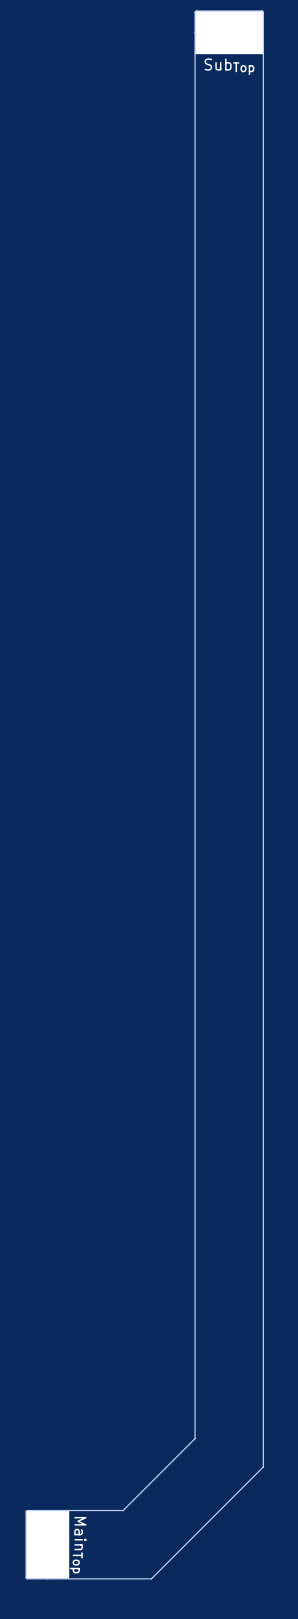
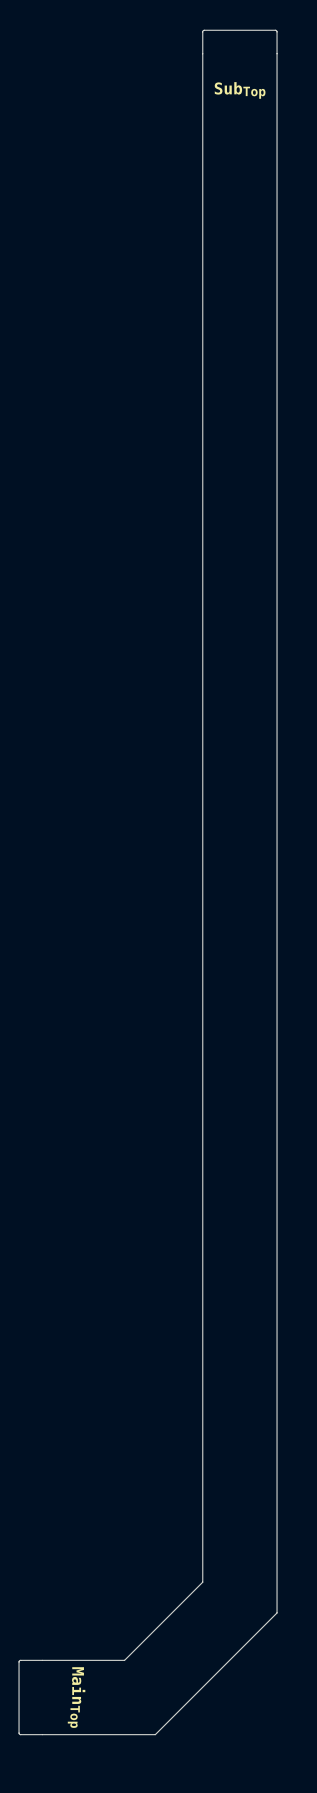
drawing: [195, 11, 264, 55] -> none
drawing: [26, 1510, 70, 1579] -> none

